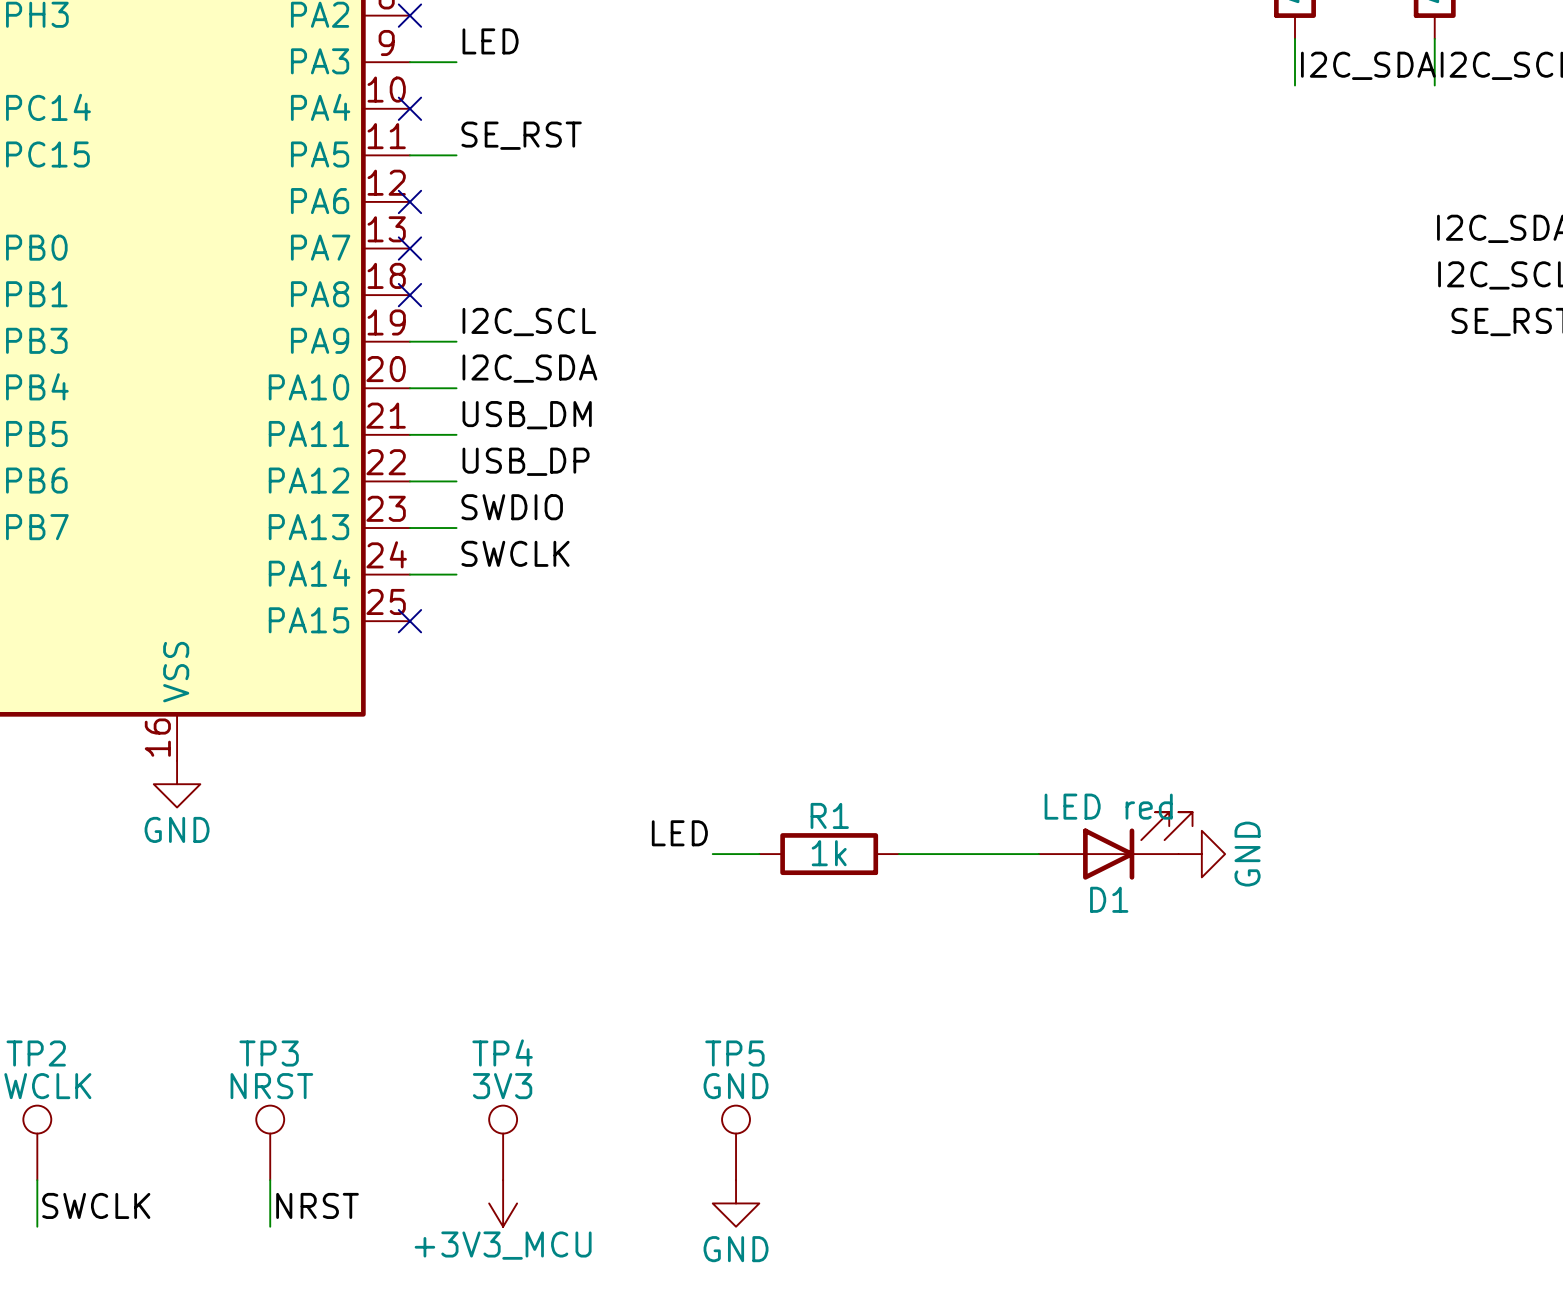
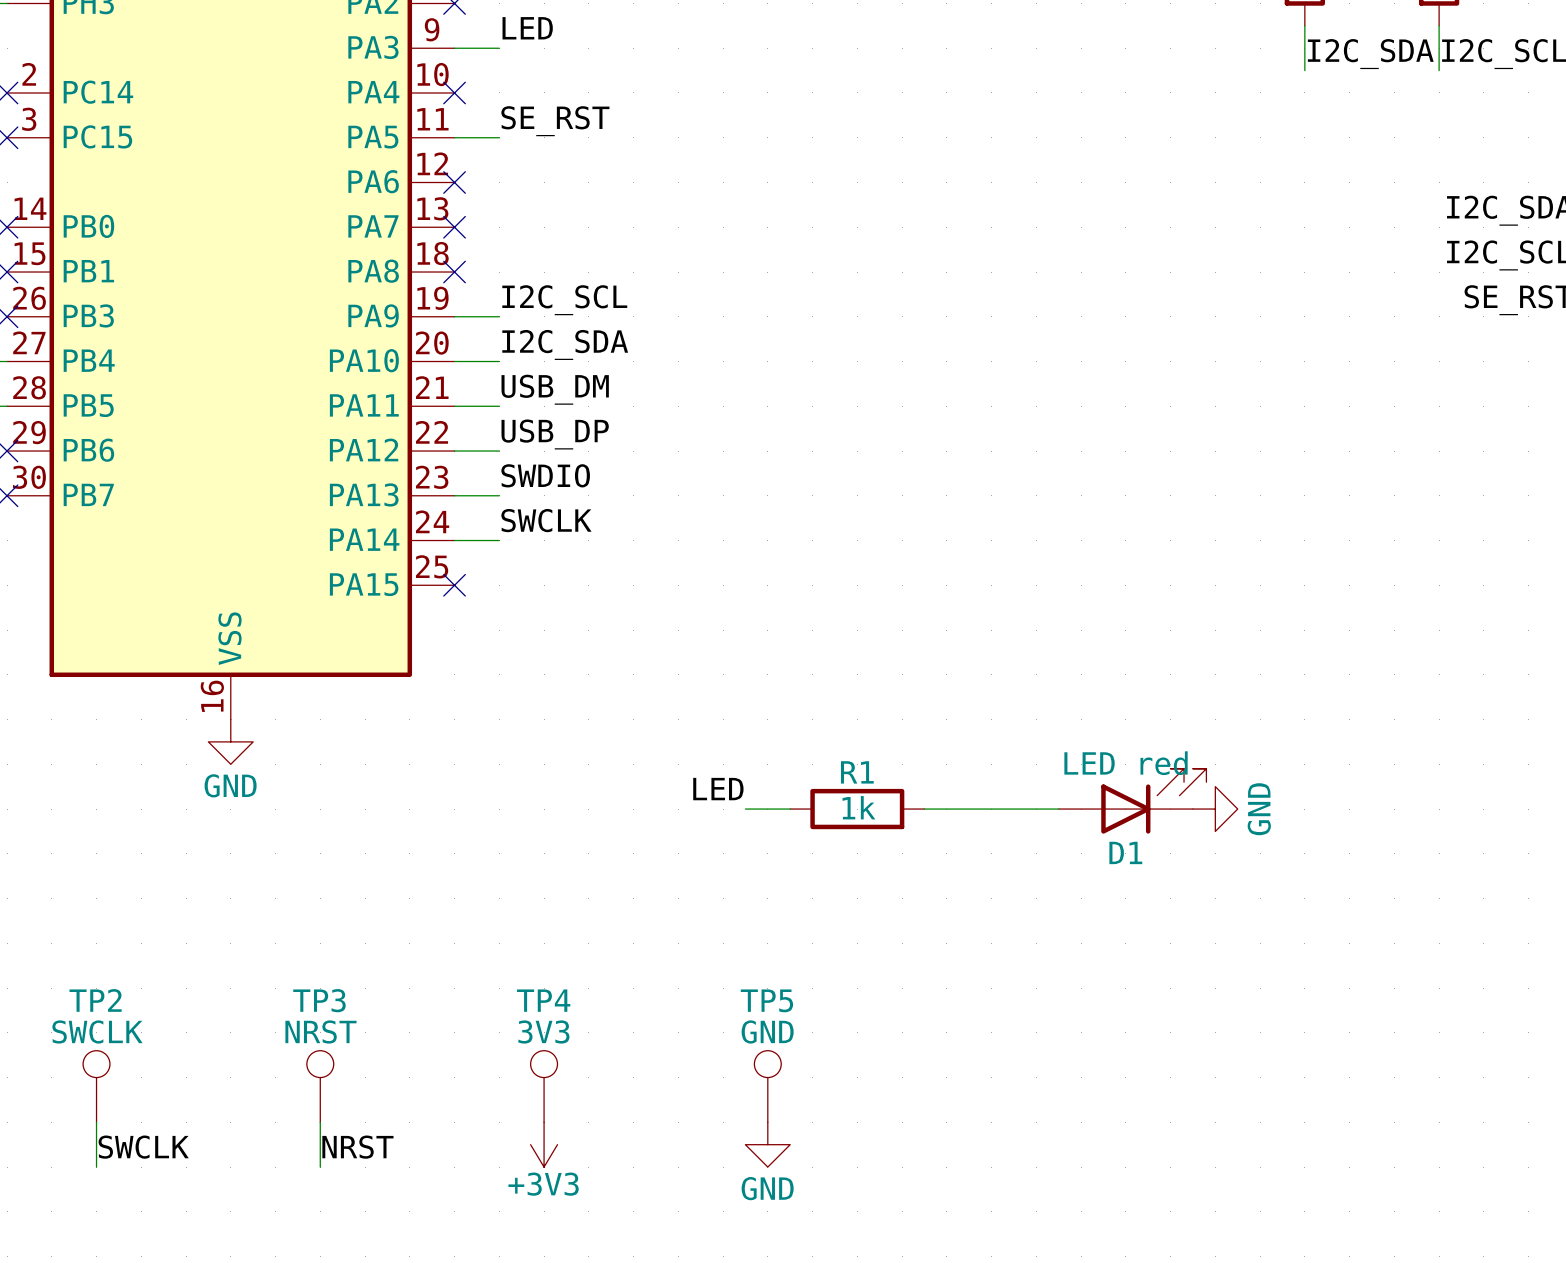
power symbol: +3V3_MCU (503, 1203) -> +3V3 (544, 1144)

